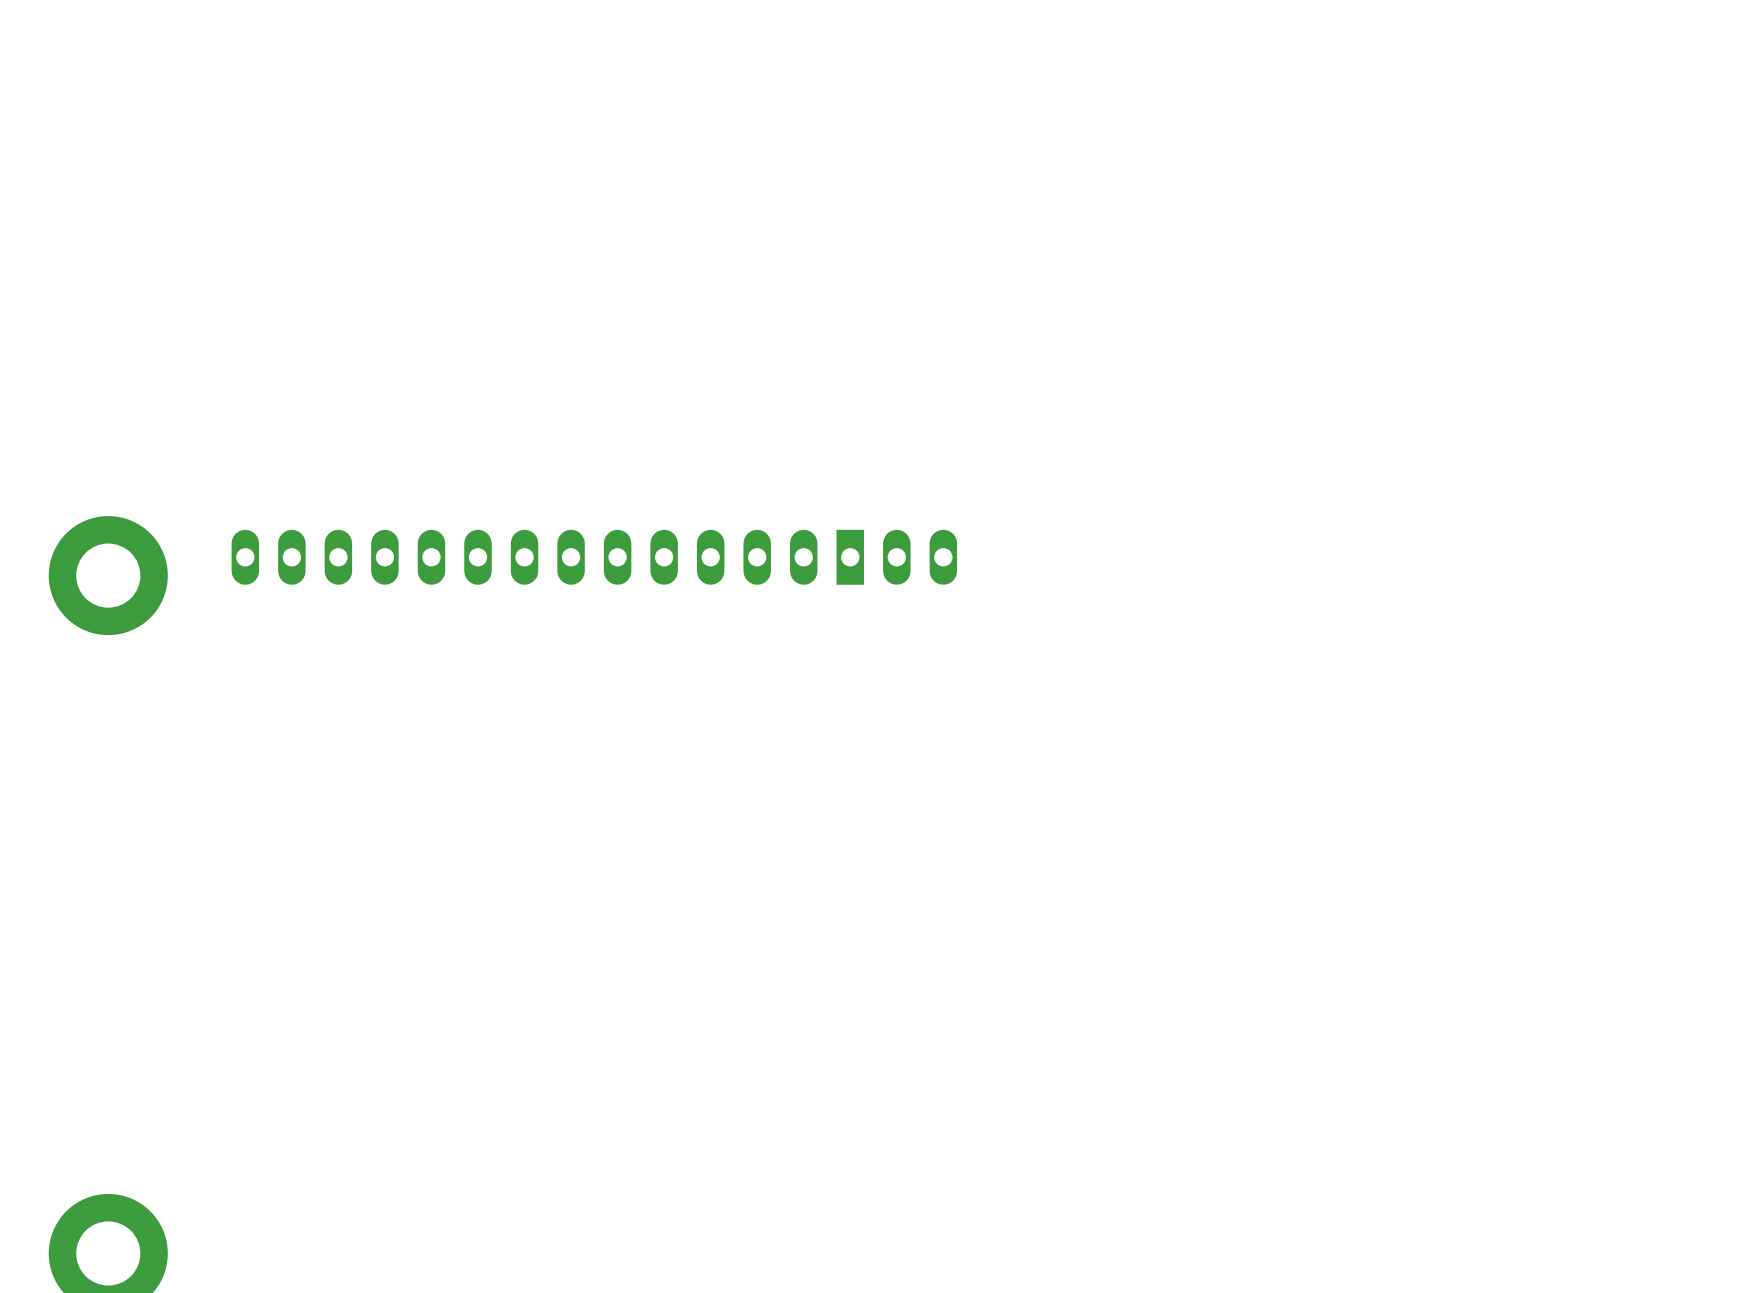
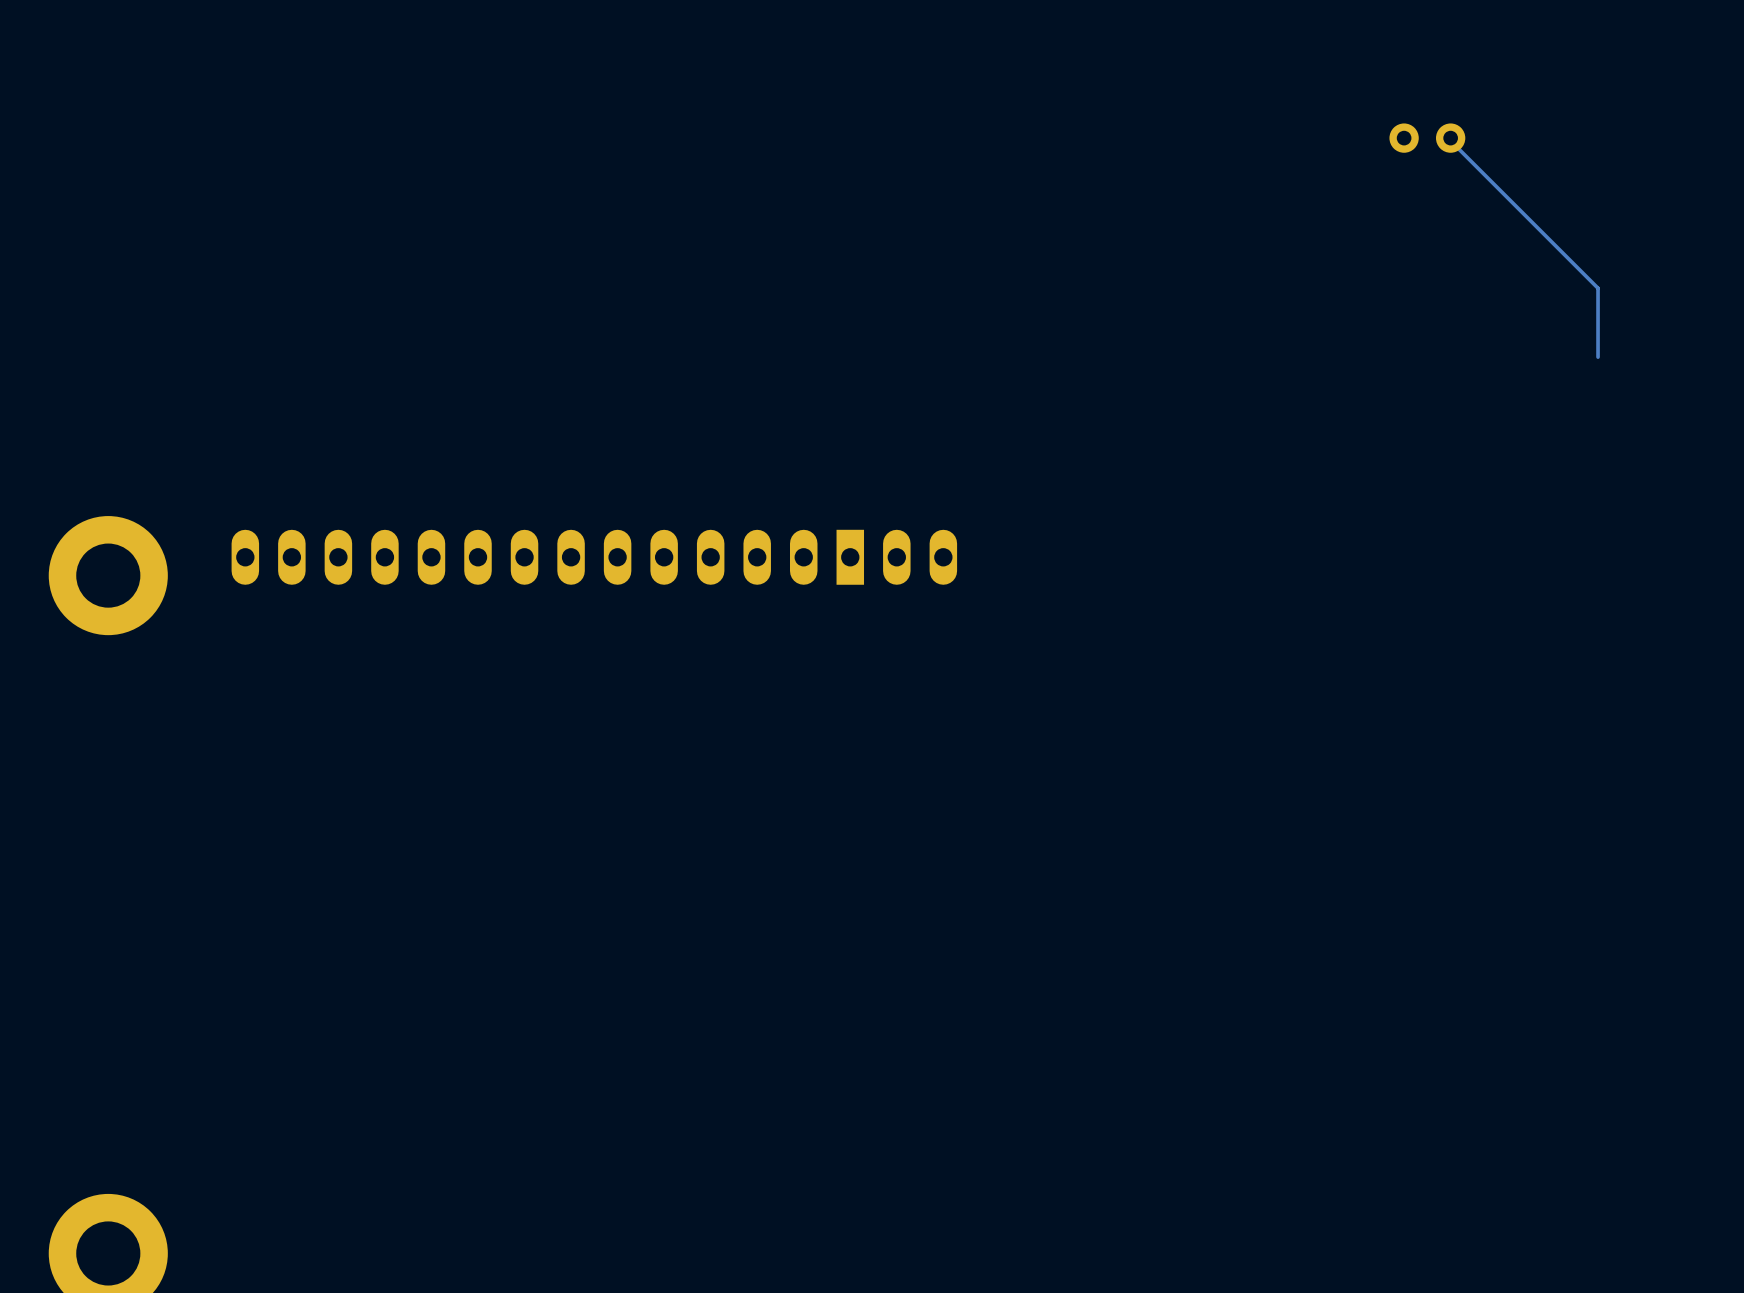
part: none -> (1427, 138)
track: none -> (1450, 138) (1447, 138) (1598, 288) (1598, 357)

